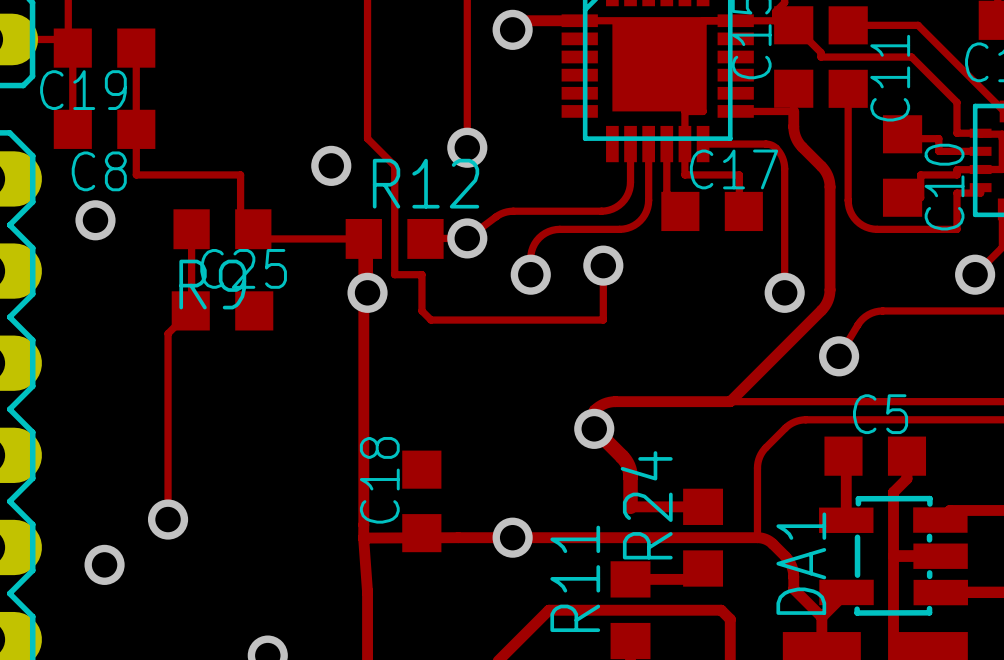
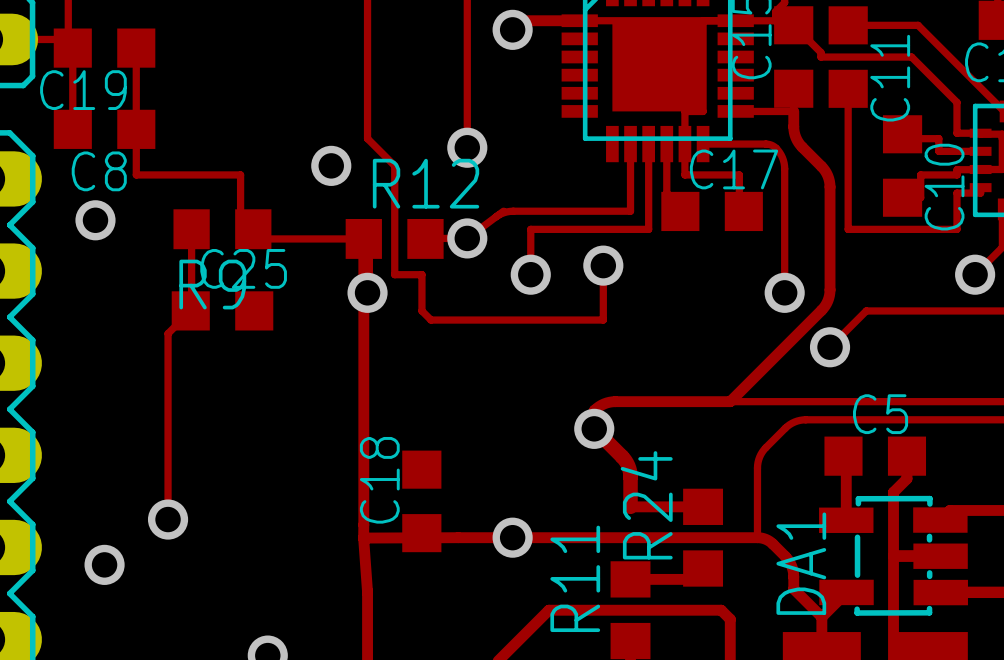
track: (630, 182) (628, 193) (622, 202) (612, 209) (601, 211) -> (630, 182) (630, 211) (601, 211)
track: (648, 200) (646, 211) (640, 220) (630, 227) (619, 229) -> (648, 200) (648, 229) (619, 229)
track: (848, 200) (850, 211) (856, 220) (866, 227) (877, 229) -> (848, 200) (848, 229) (877, 229)
track: (559, 229) (548, 231) (539, 237) (532, 247) (530, 258) -> (559, 229) (530, 229) (530, 258)
track: (882, 310) (871, 313) (862, 319) (839, 356) -> (882, 310) (866, 310) (830, 347)
via position: (839, 356) -> (830, 347)

